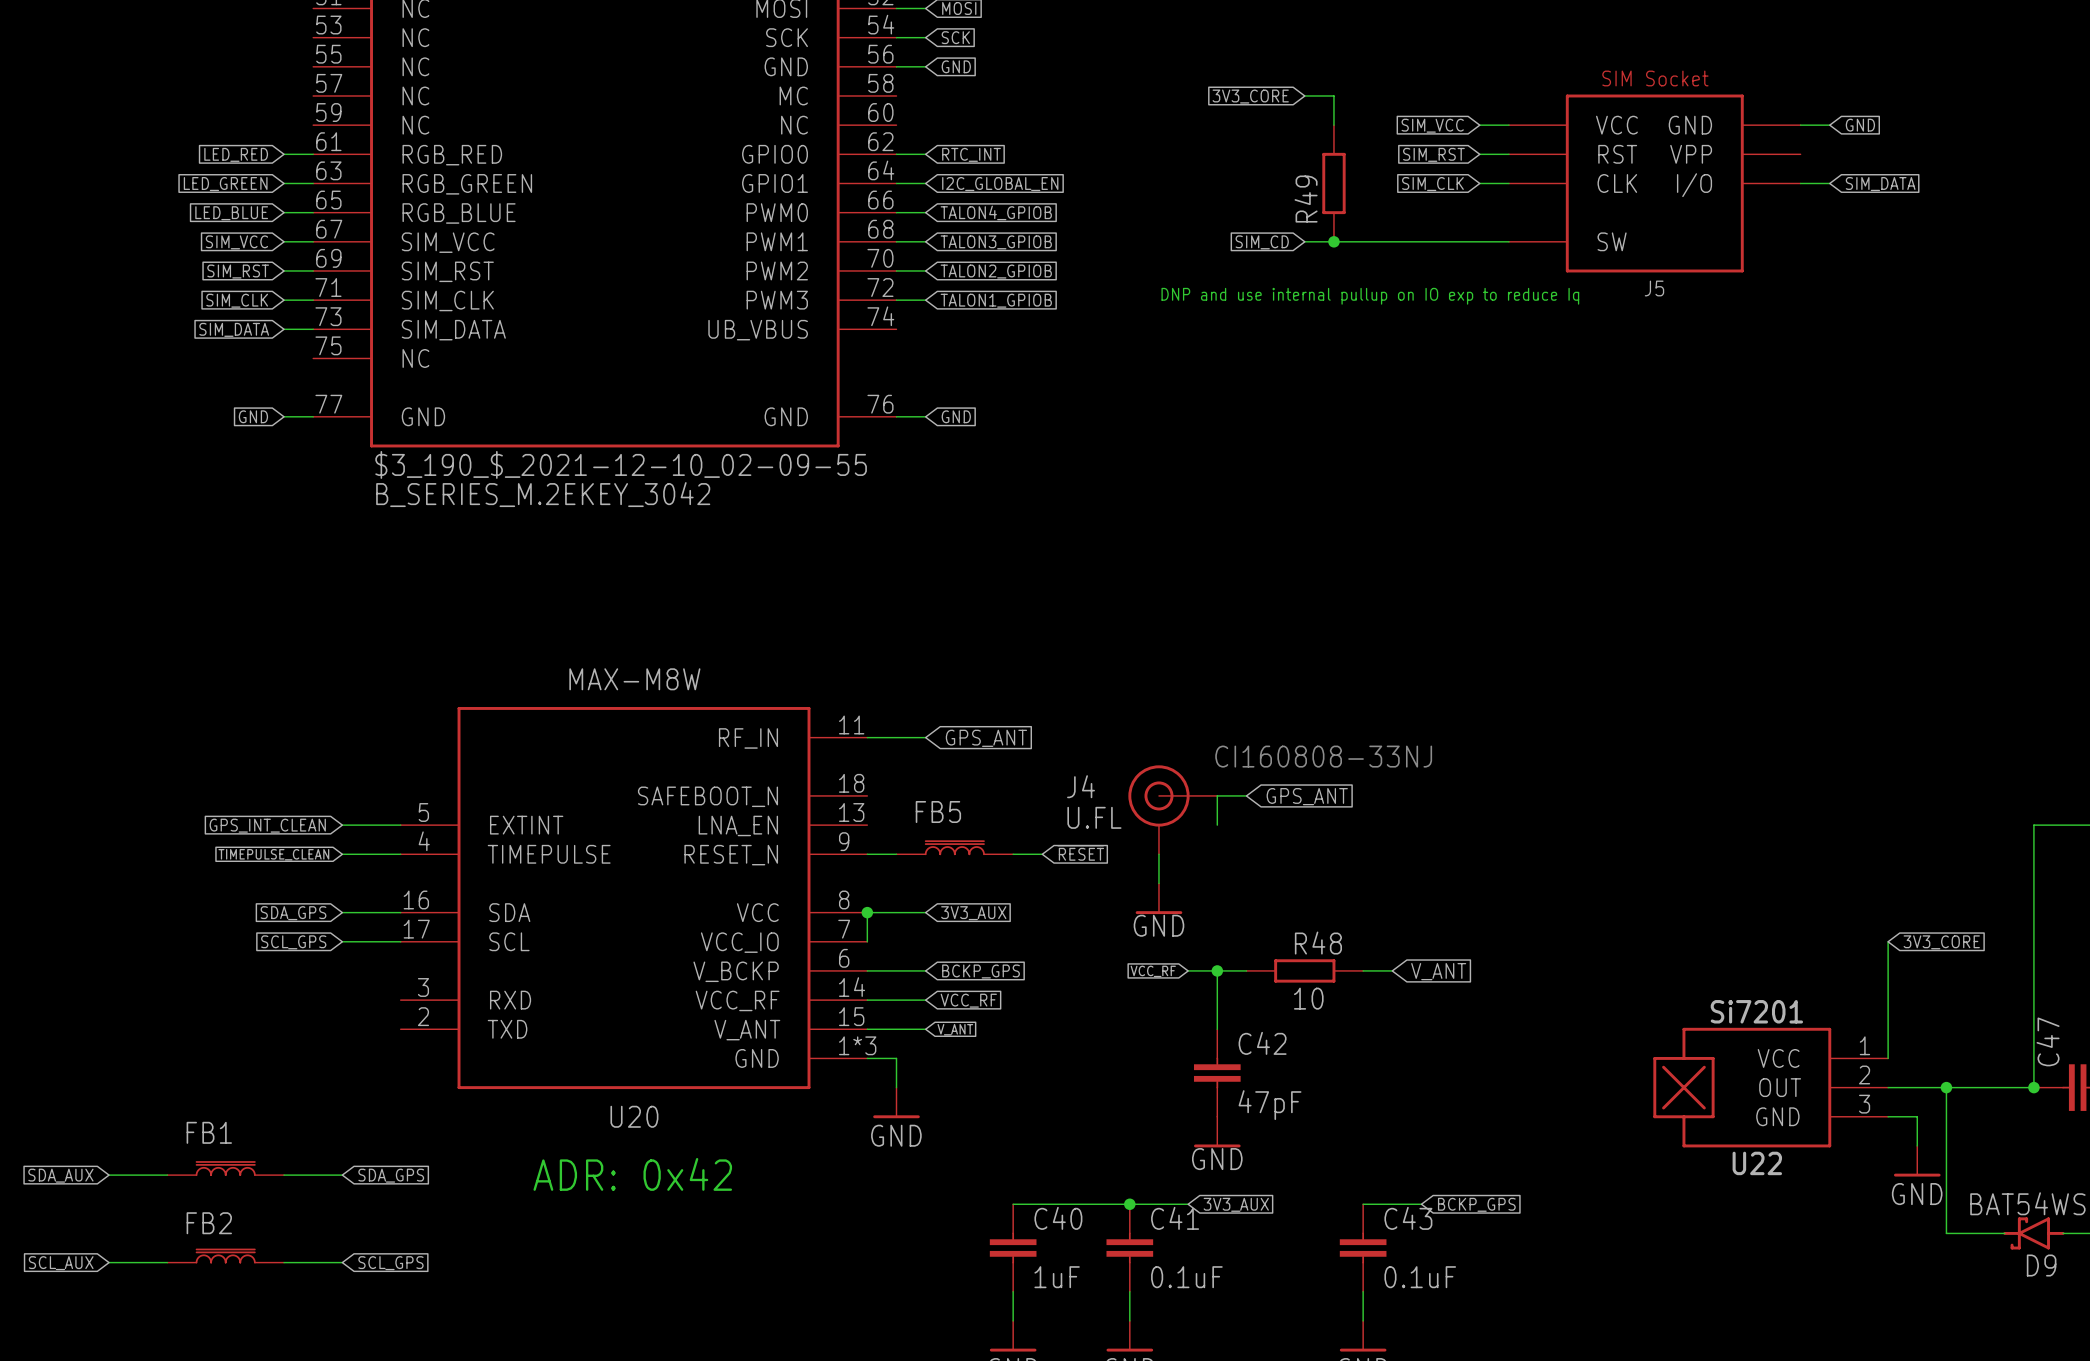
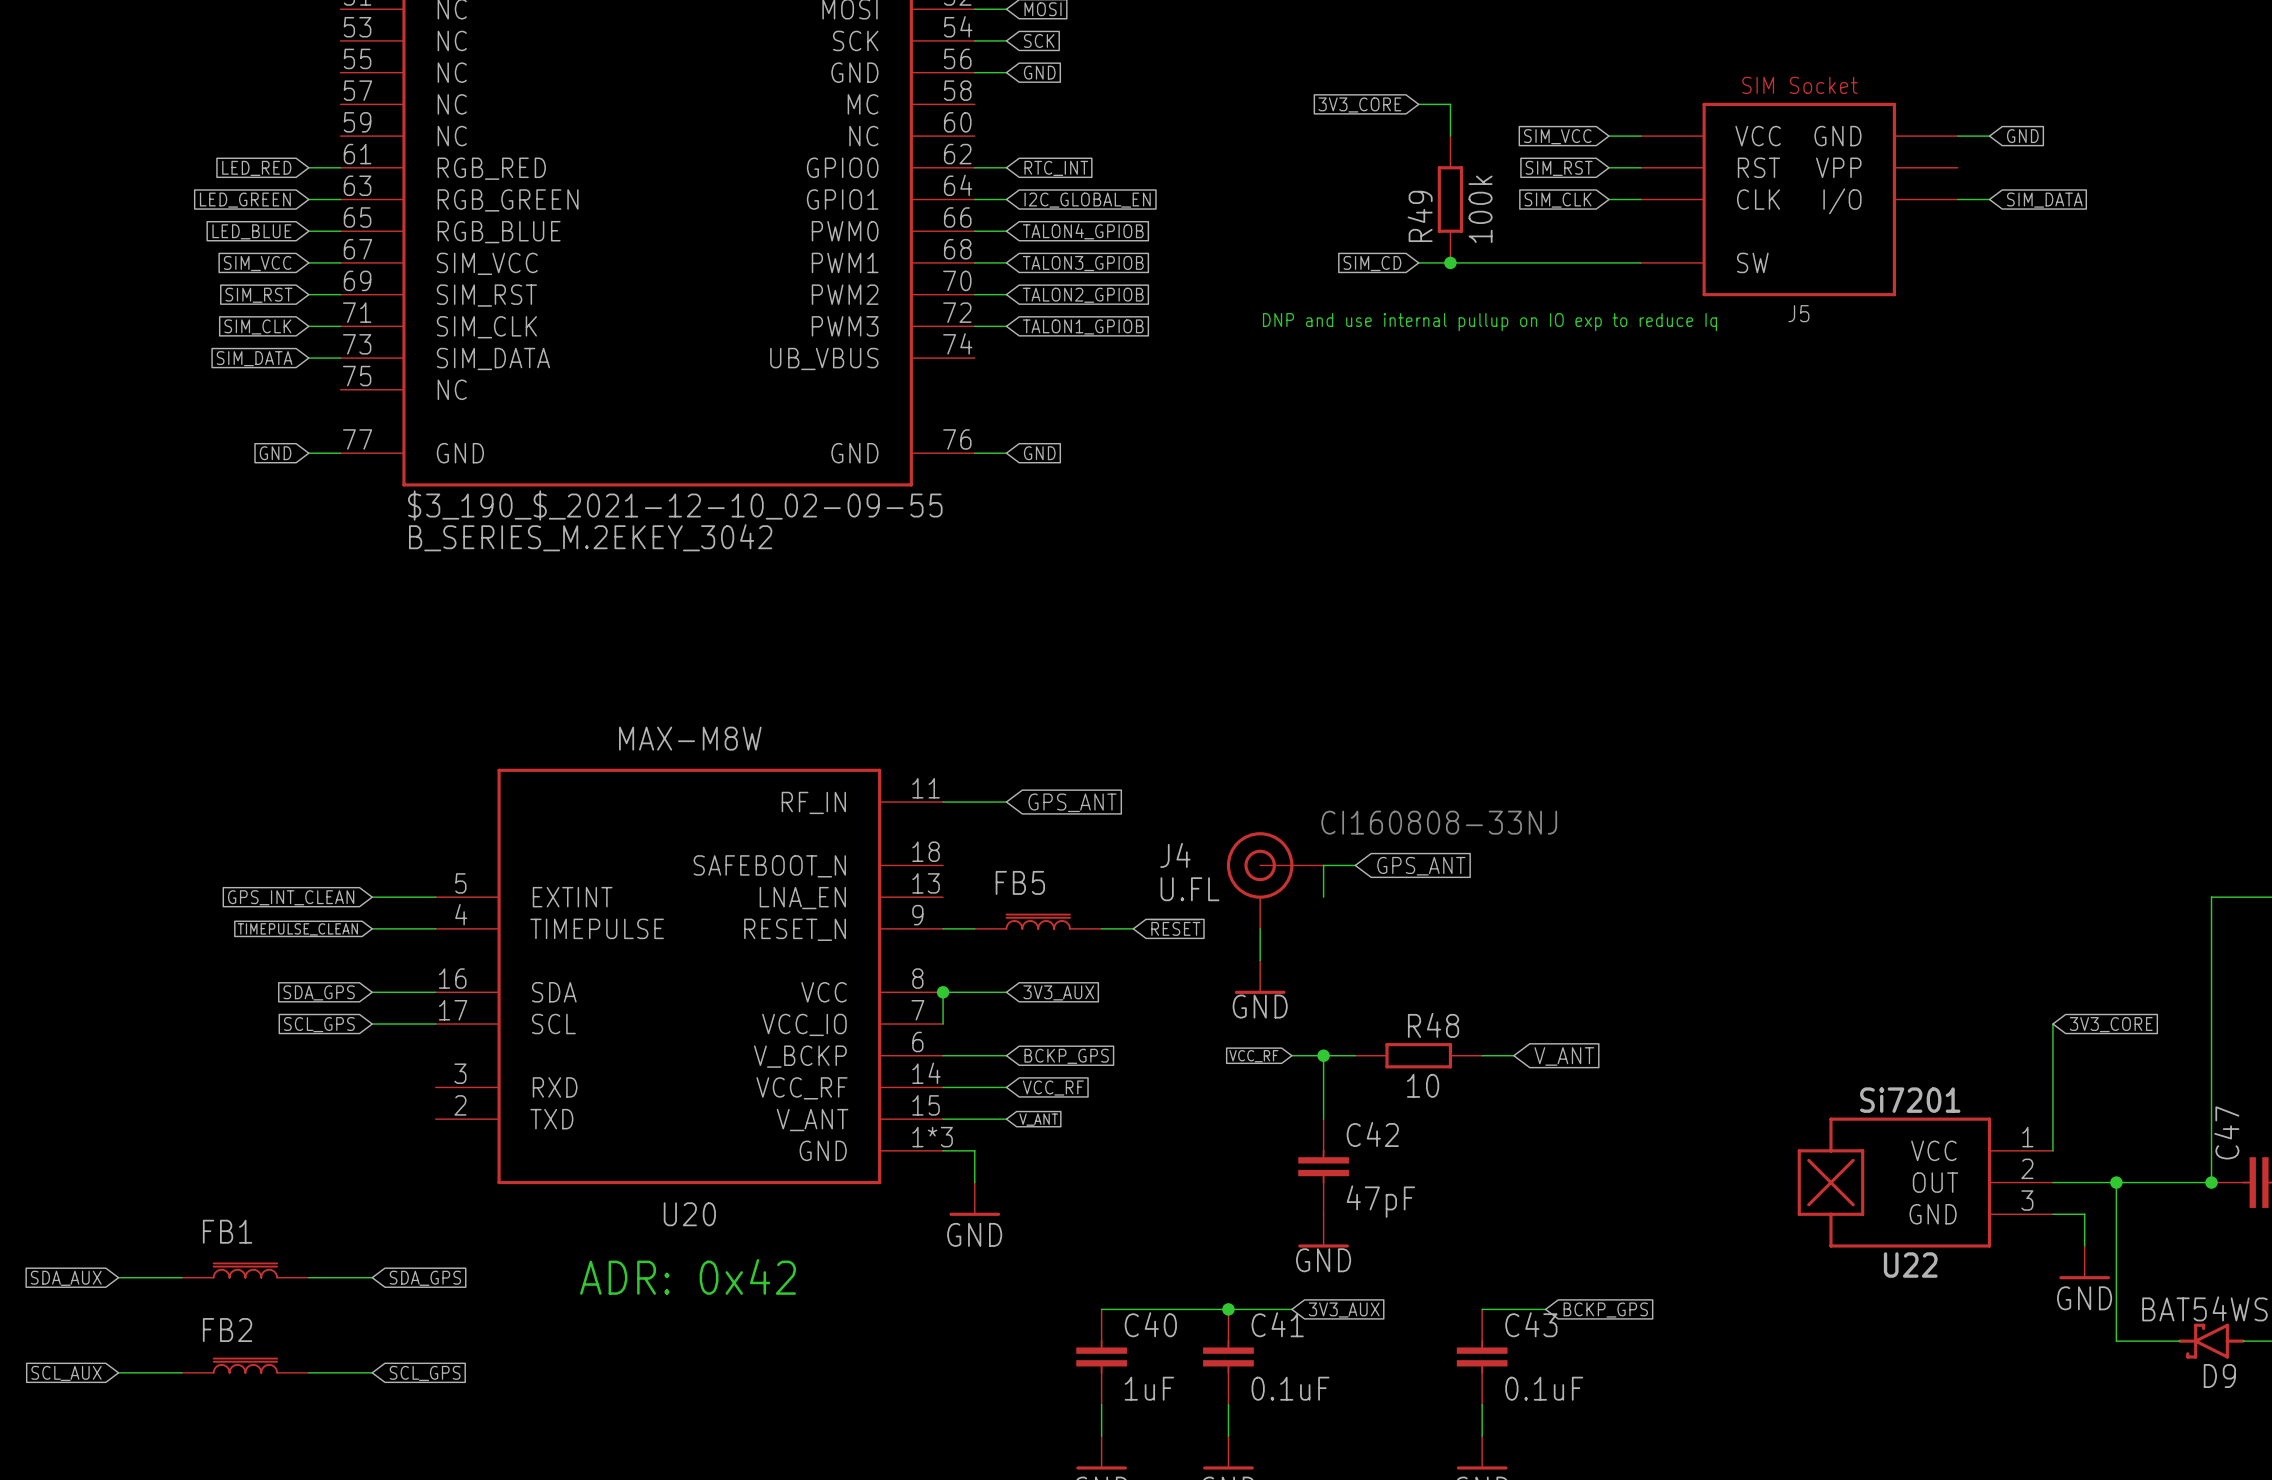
R49 value: none -> 100k (1480, 209)

